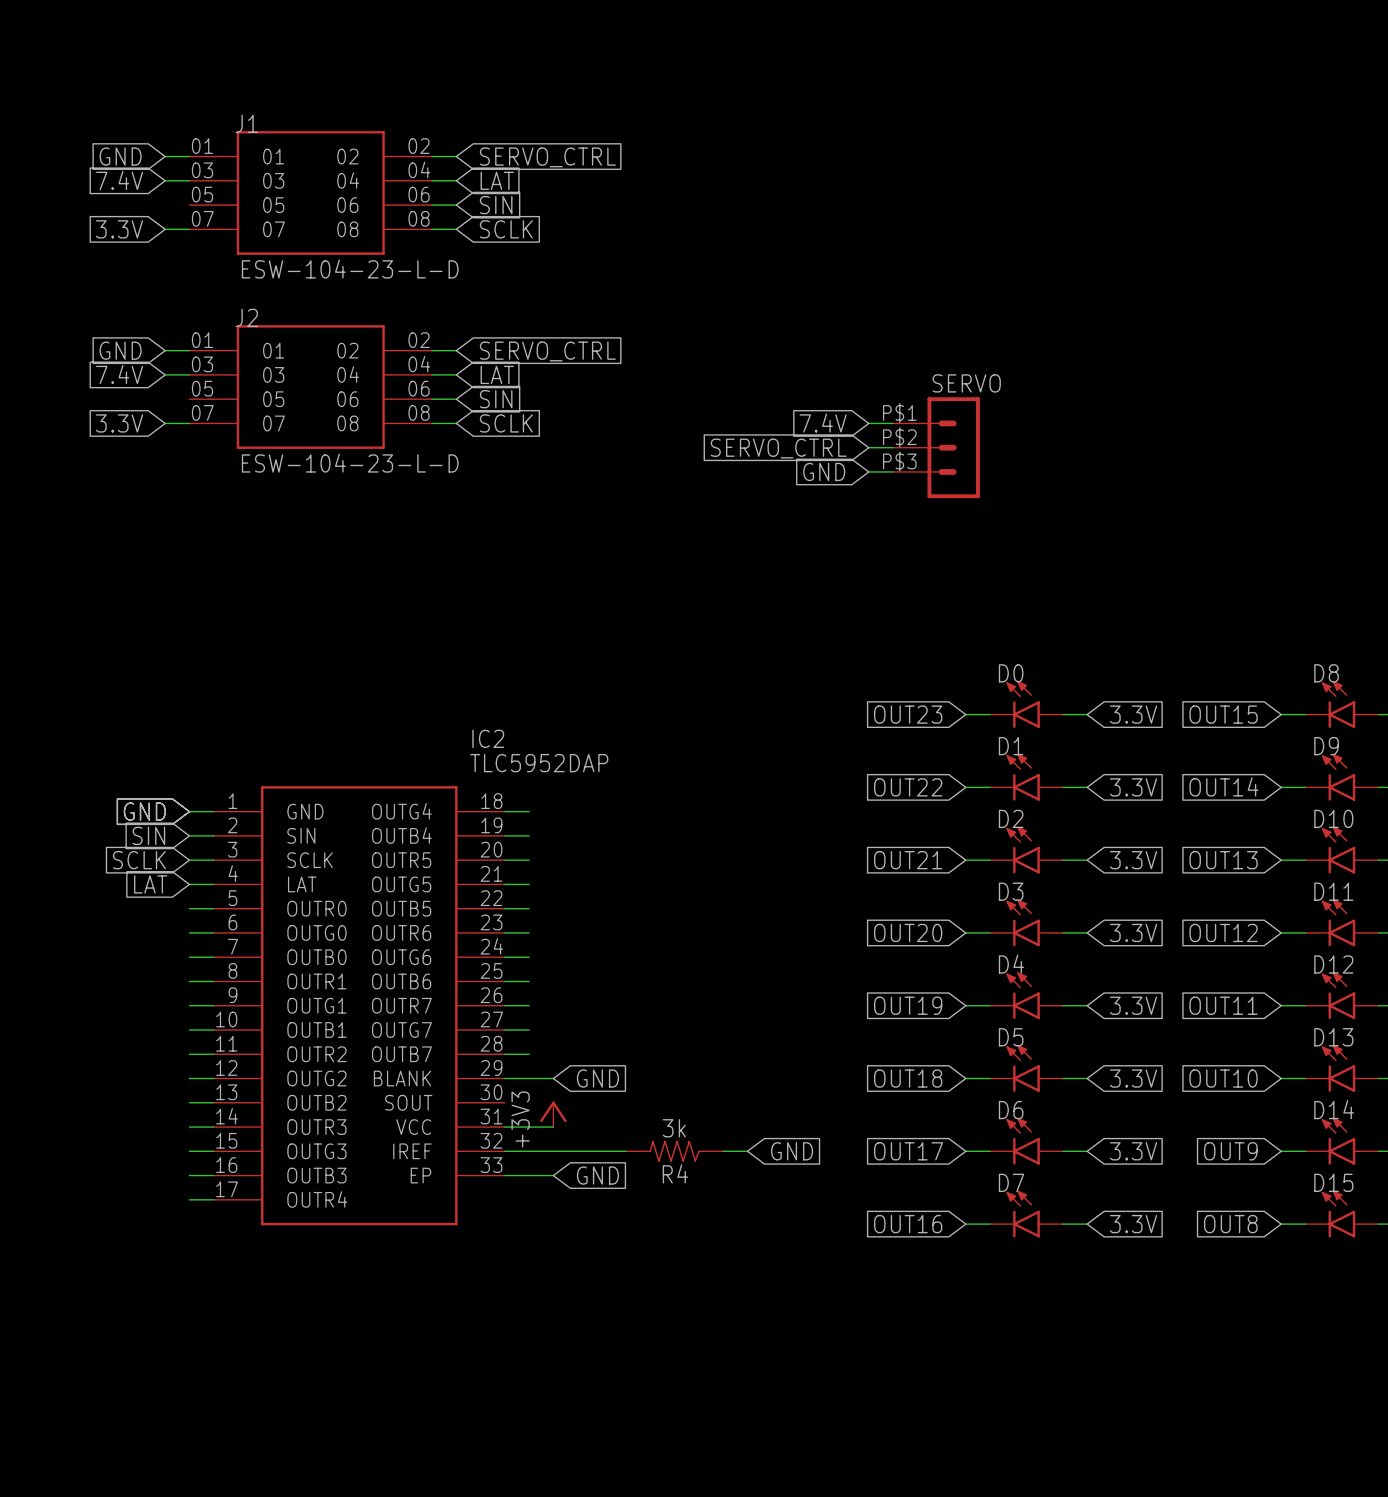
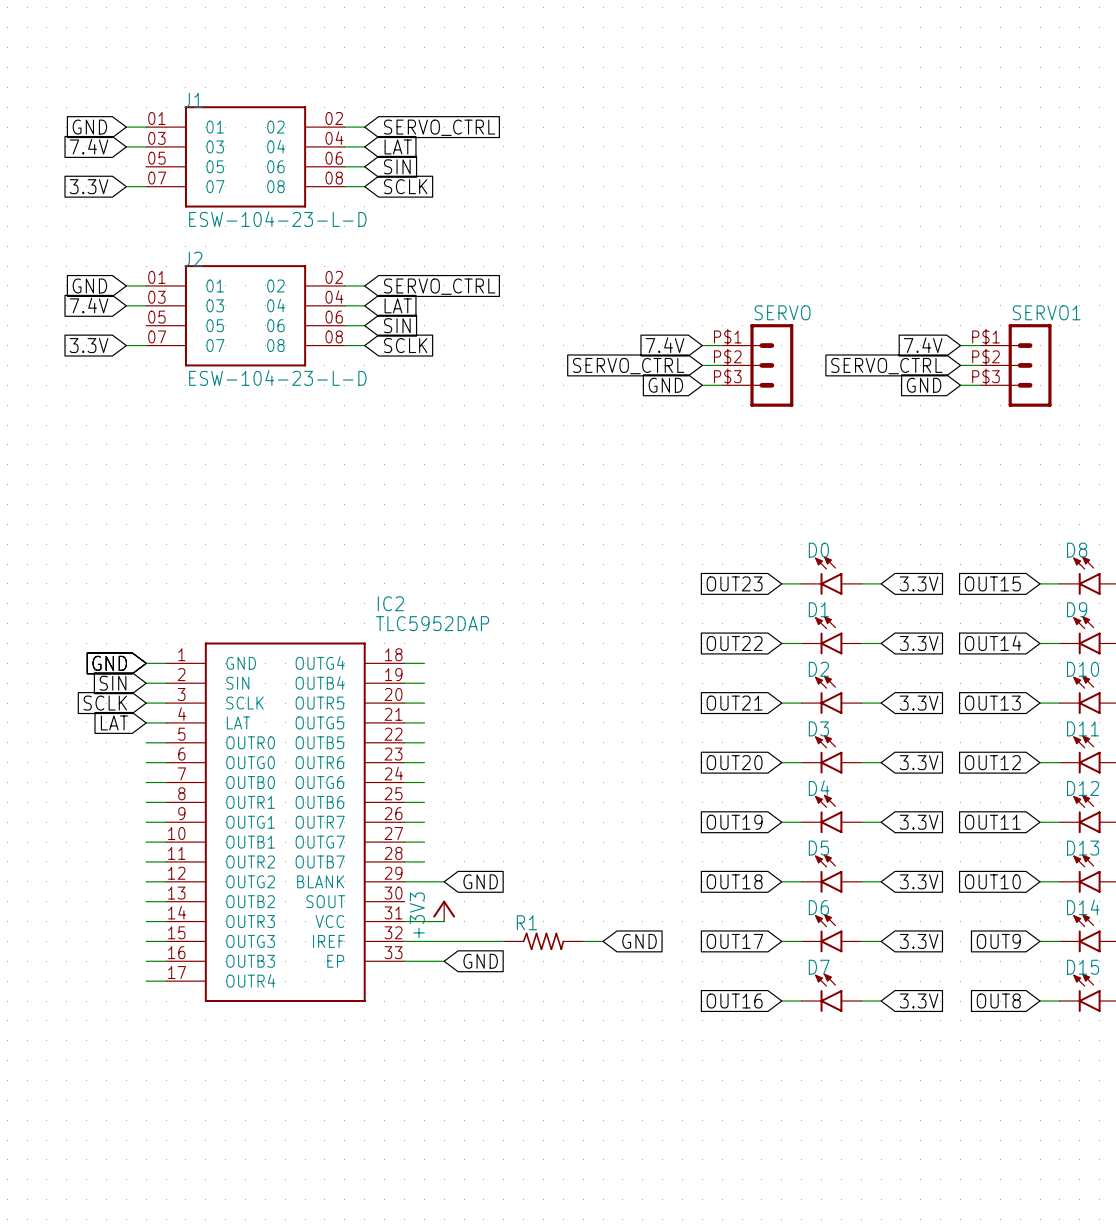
global label: none -> 7.4V (923, 345)
wire: none -> (960, 345) (980, 345)
wire: none -> (960, 365) (980, 365)
SERVO1: none -> (1015, 365)
global label: none -> SERVO_CTRL (886, 366)
global label: none -> GND (924, 385)
wire: none -> (960, 385) (980, 385)
R4: 3k (674, 1151) -> none
R1: none -> (543, 941)

